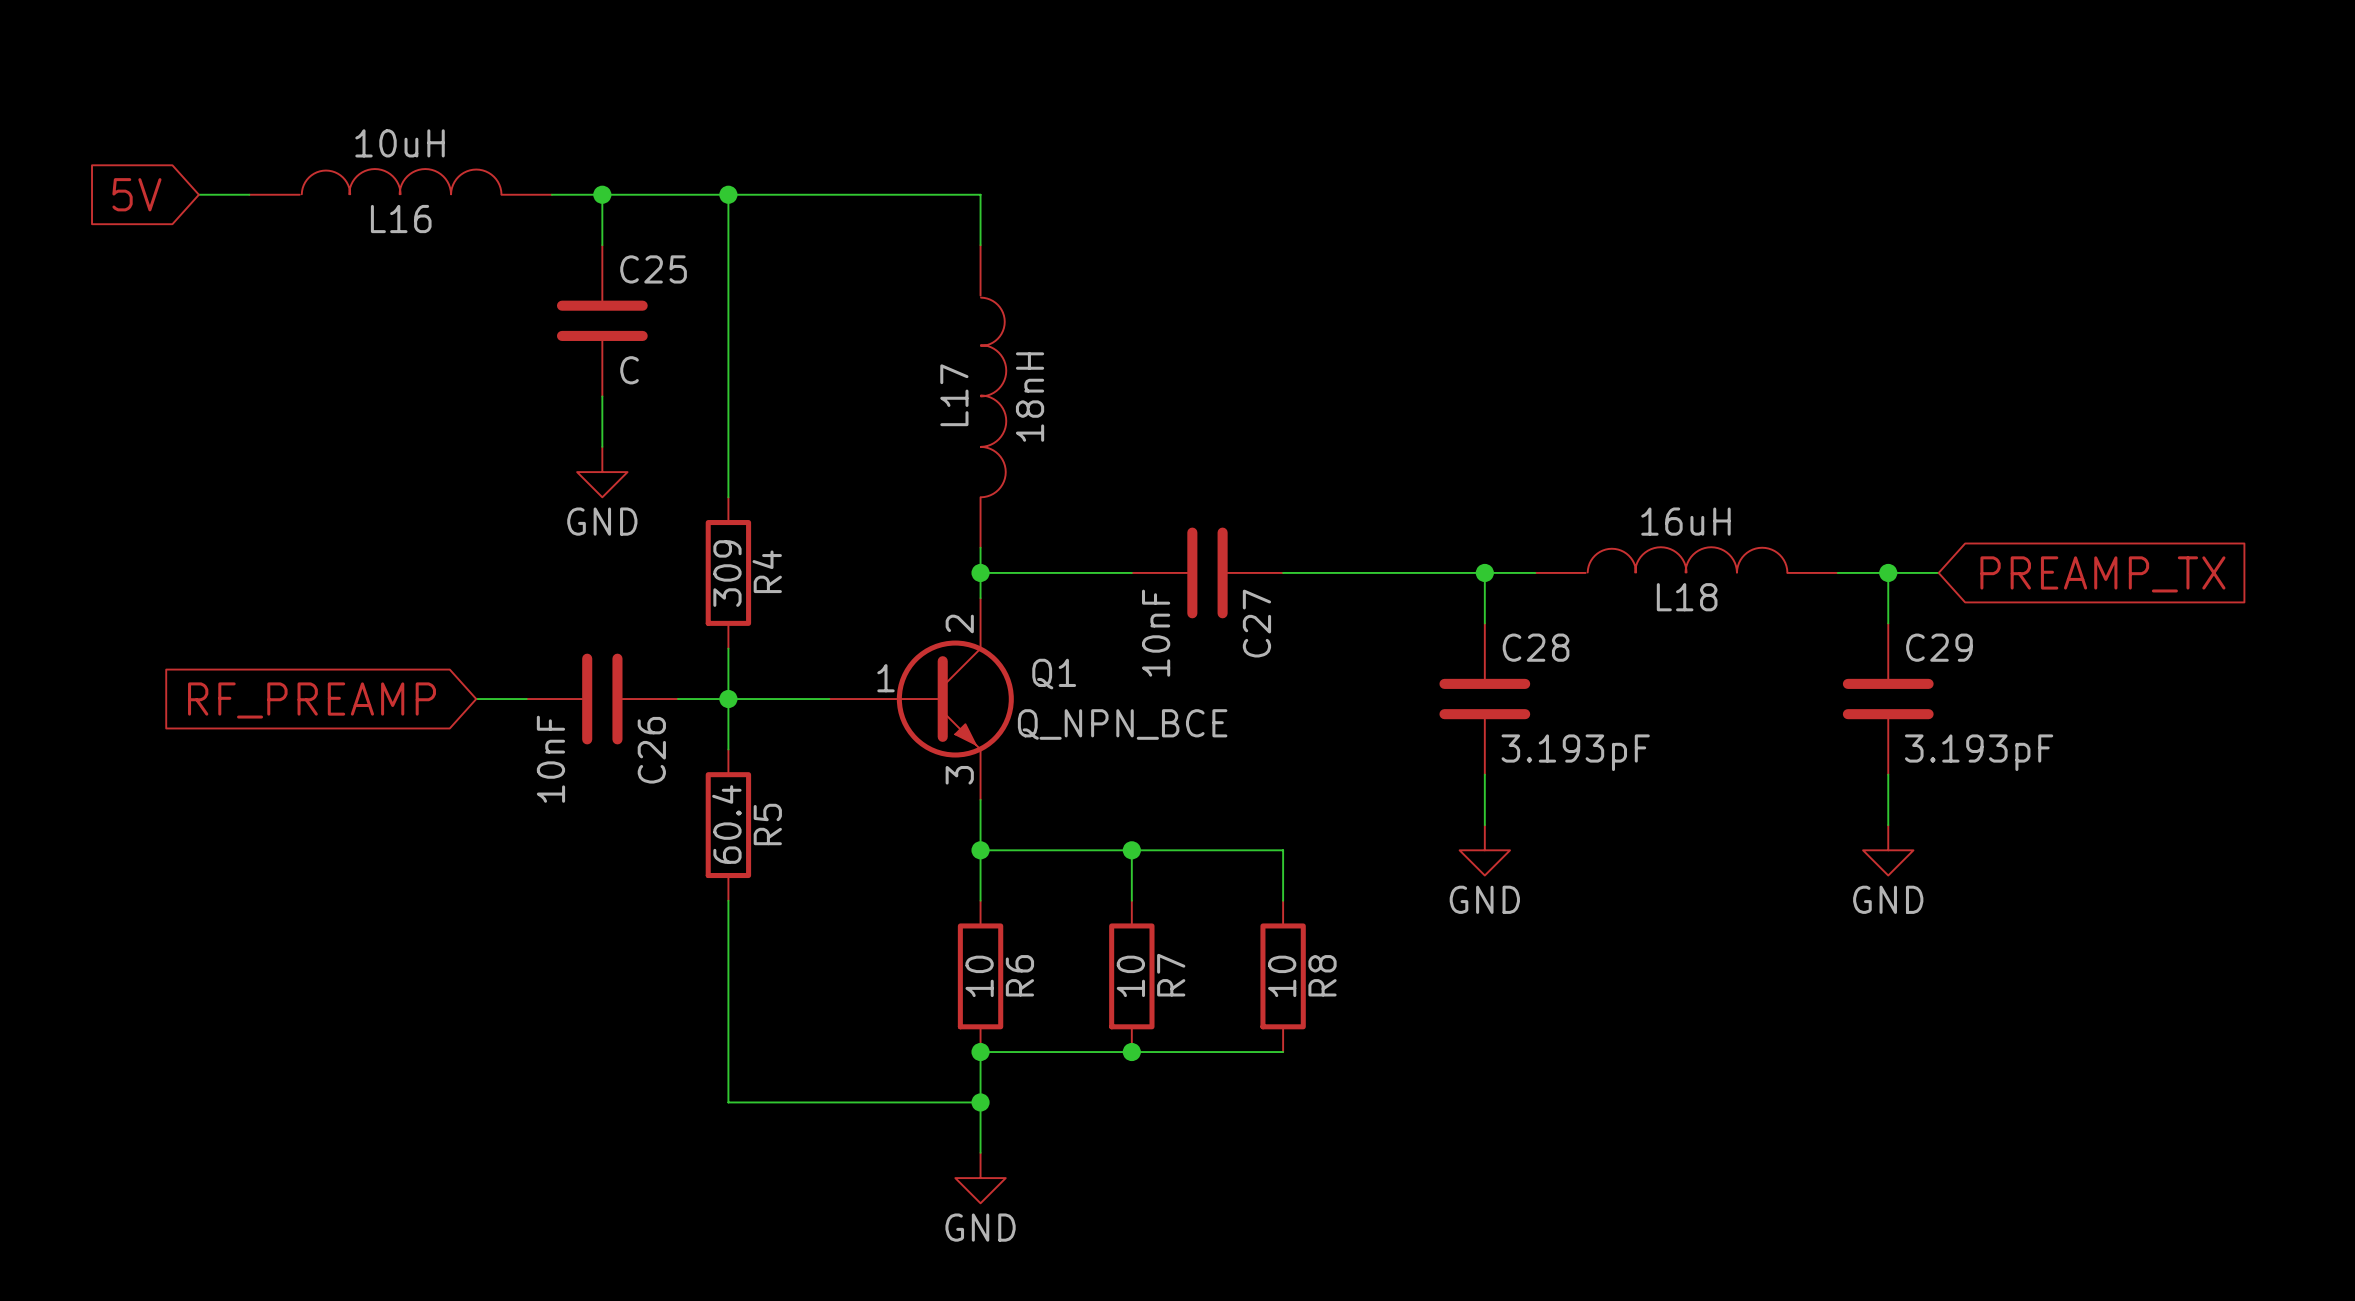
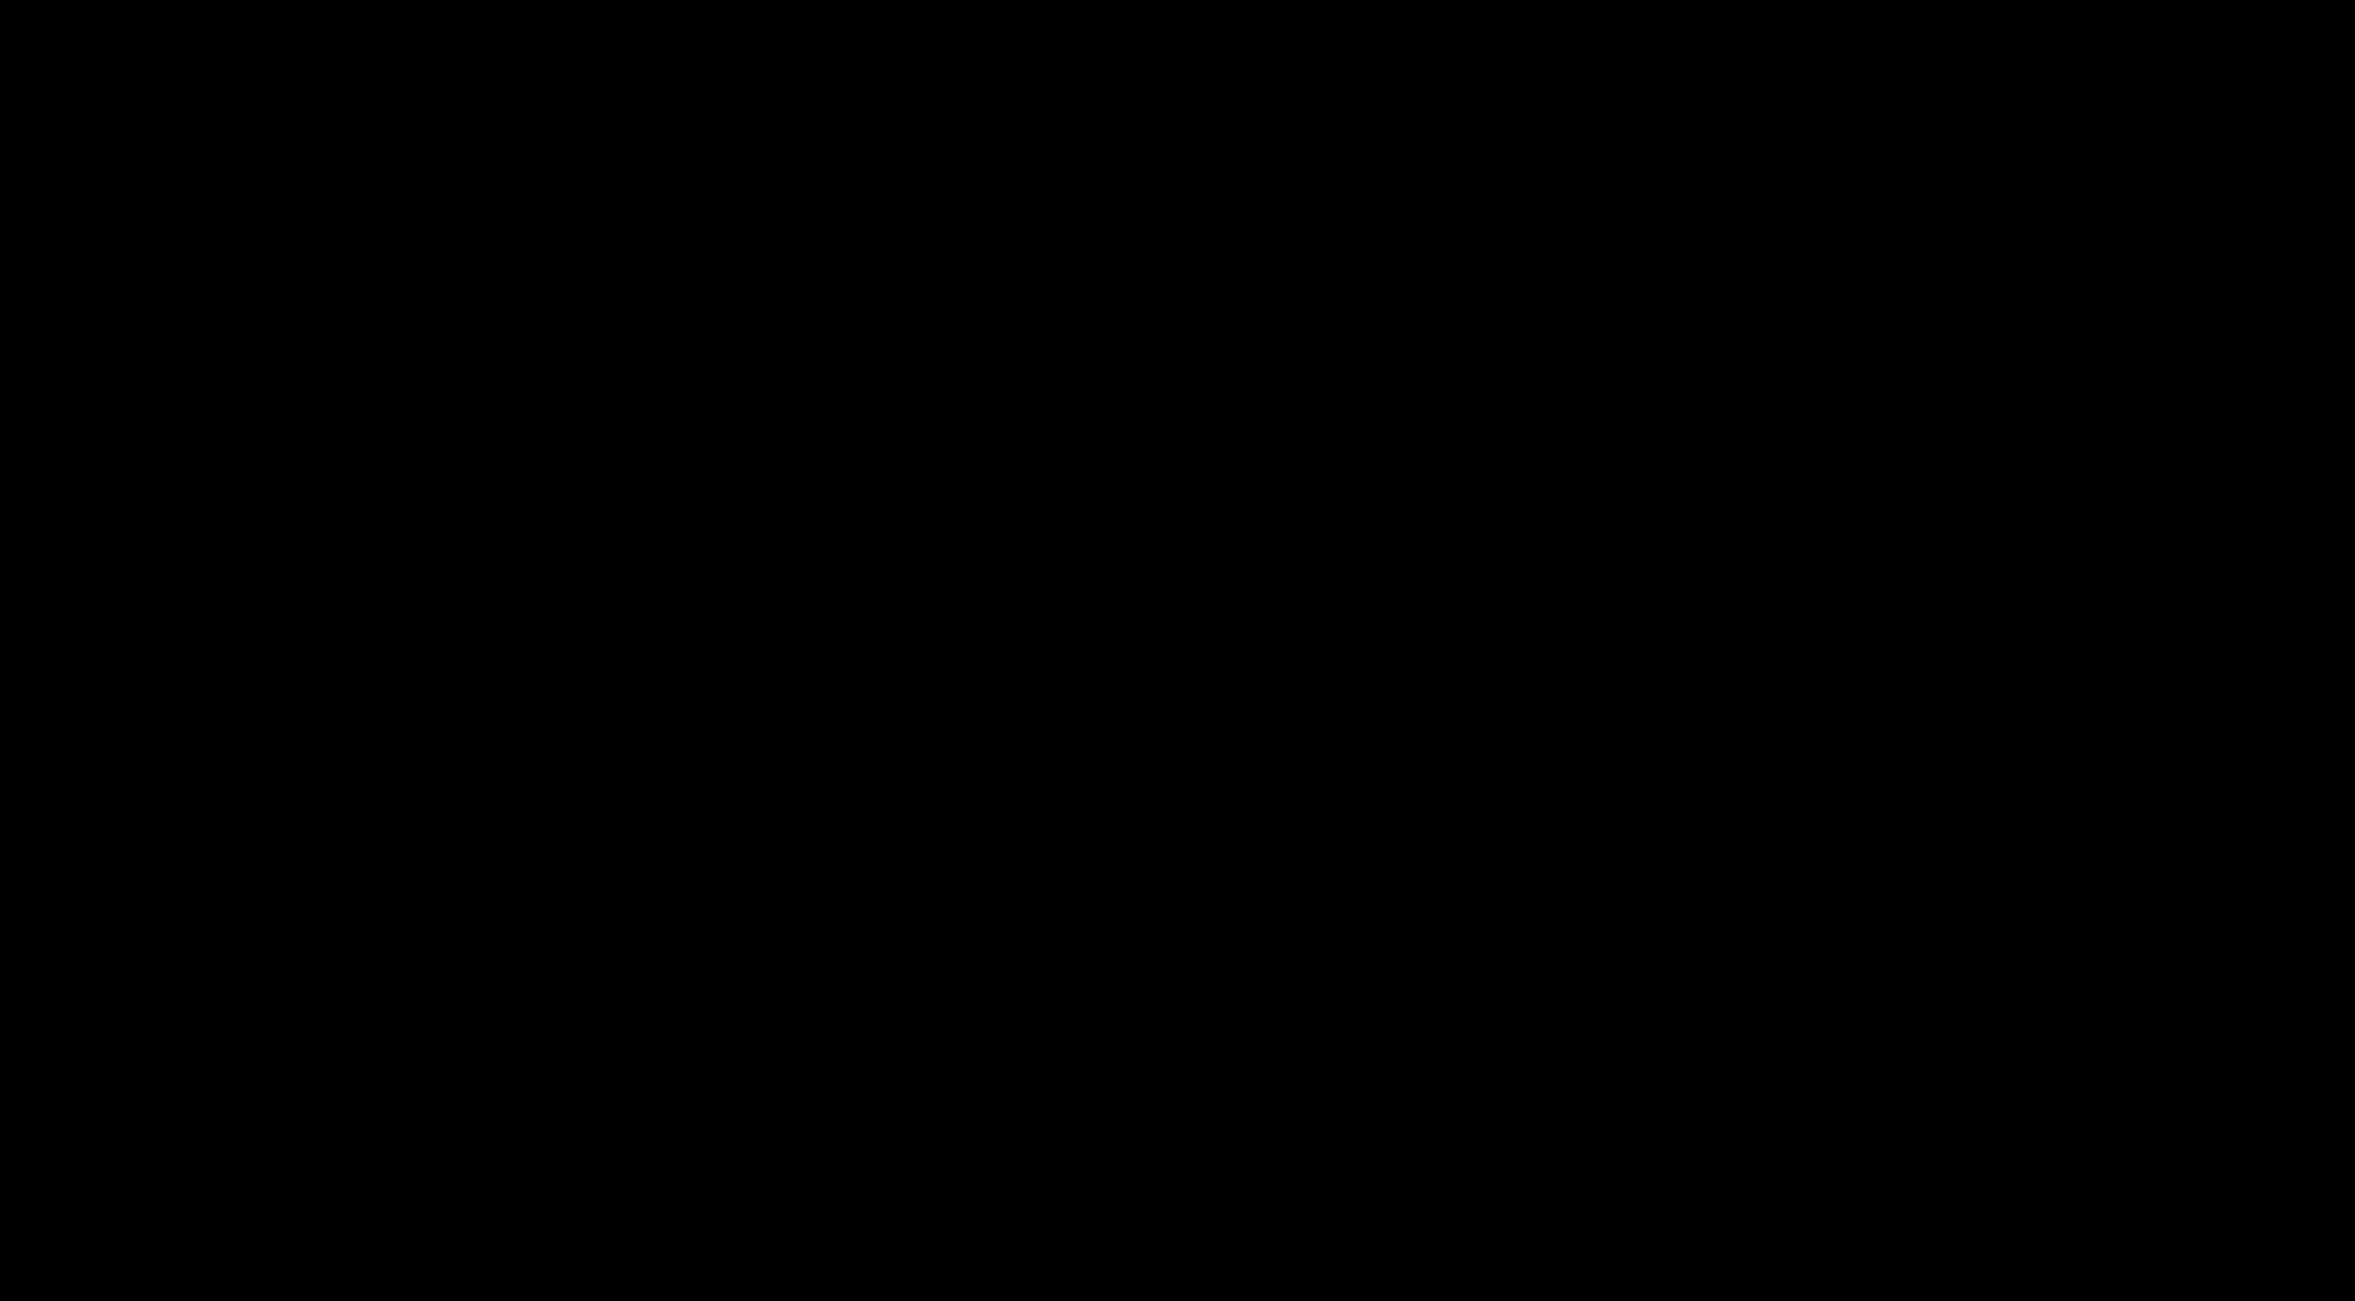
L16: 10uH (400, 181) -> none
global label: 5V (136, 194) -> none
wire: (198, 194) (249, 194) -> none
wire: (551, 194) (980, 194) (980, 245) -> none
wire: (602, 194) (602, 245) -> none
junction: (602, 194) -> none
wire: (728, 194) (728, 497) -> none
junction: (728, 194) -> none
C25: C (602, 320) -> none
wire: (602, 396) (602, 446) -> none
L17: 18nH (993, 396) -> none
power symbol: GND (602, 472) -> none
wire: (980, 547) (980, 598) -> none
L18: 16uH (1686, 560) -> none
R4: 309 (728, 572) -> none
wire: (980, 572) (1131, 572) -> none
junction: (980, 572) -> none
C27: 10nF (1207, 572) -> none
wire: (1283, 572) (1535, 572) -> none
wire: (1484, 572) (1484, 623) -> none
junction: (1484, 572) -> none
wire: (1837, 572) (1938, 572) -> none
wire: (1888, 572) (1888, 623) -> none
junction: (1888, 572) -> none
global label: PREAMP_TX (2102, 574) -> none
wire: (728, 648) (728, 749) -> none
wire: (476, 699) (526, 699) -> none
C26: 10nF (602, 699) -> none
wire: (677, 699) (829, 699) -> none
junction: (728, 699) -> none
Q1: Q_NPN_BCE (921, 699) -> none
C28: 3.193pF (1484, 699) -> none
C29: 3.193pF (1888, 699) -> none
global label: RF_PREAMP (312, 700) -> none
wire: (1484, 774) (1484, 825) -> none
wire: (1888, 774) (1888, 825) -> none
wire: (980, 799) (980, 900) -> none
R5: 60.4 (728, 825) -> none
wire: (980, 850) (1283, 850) (1283, 900) -> none
junction: (980, 850) -> none
wire: (1131, 850) (1131, 900) -> none
junction: (1131, 850) -> none
power symbol: GND (1484, 850) -> none
power symbol: GND (1888, 850) -> none
wire: (728, 900) (728, 1102) (980, 1102) -> none
R6: 10 (980, 976) -> none
R7: 10 (1131, 976) -> none
R8: 10 (1283, 976) -> none
junction: (980, 1052) -> none
junction: (1131, 1052) -> none
wire: (1283, 1052) (980, 1052) (980, 1152) -> none
junction: (980, 1102) -> none
power symbol: GND (980, 1178) -> none

